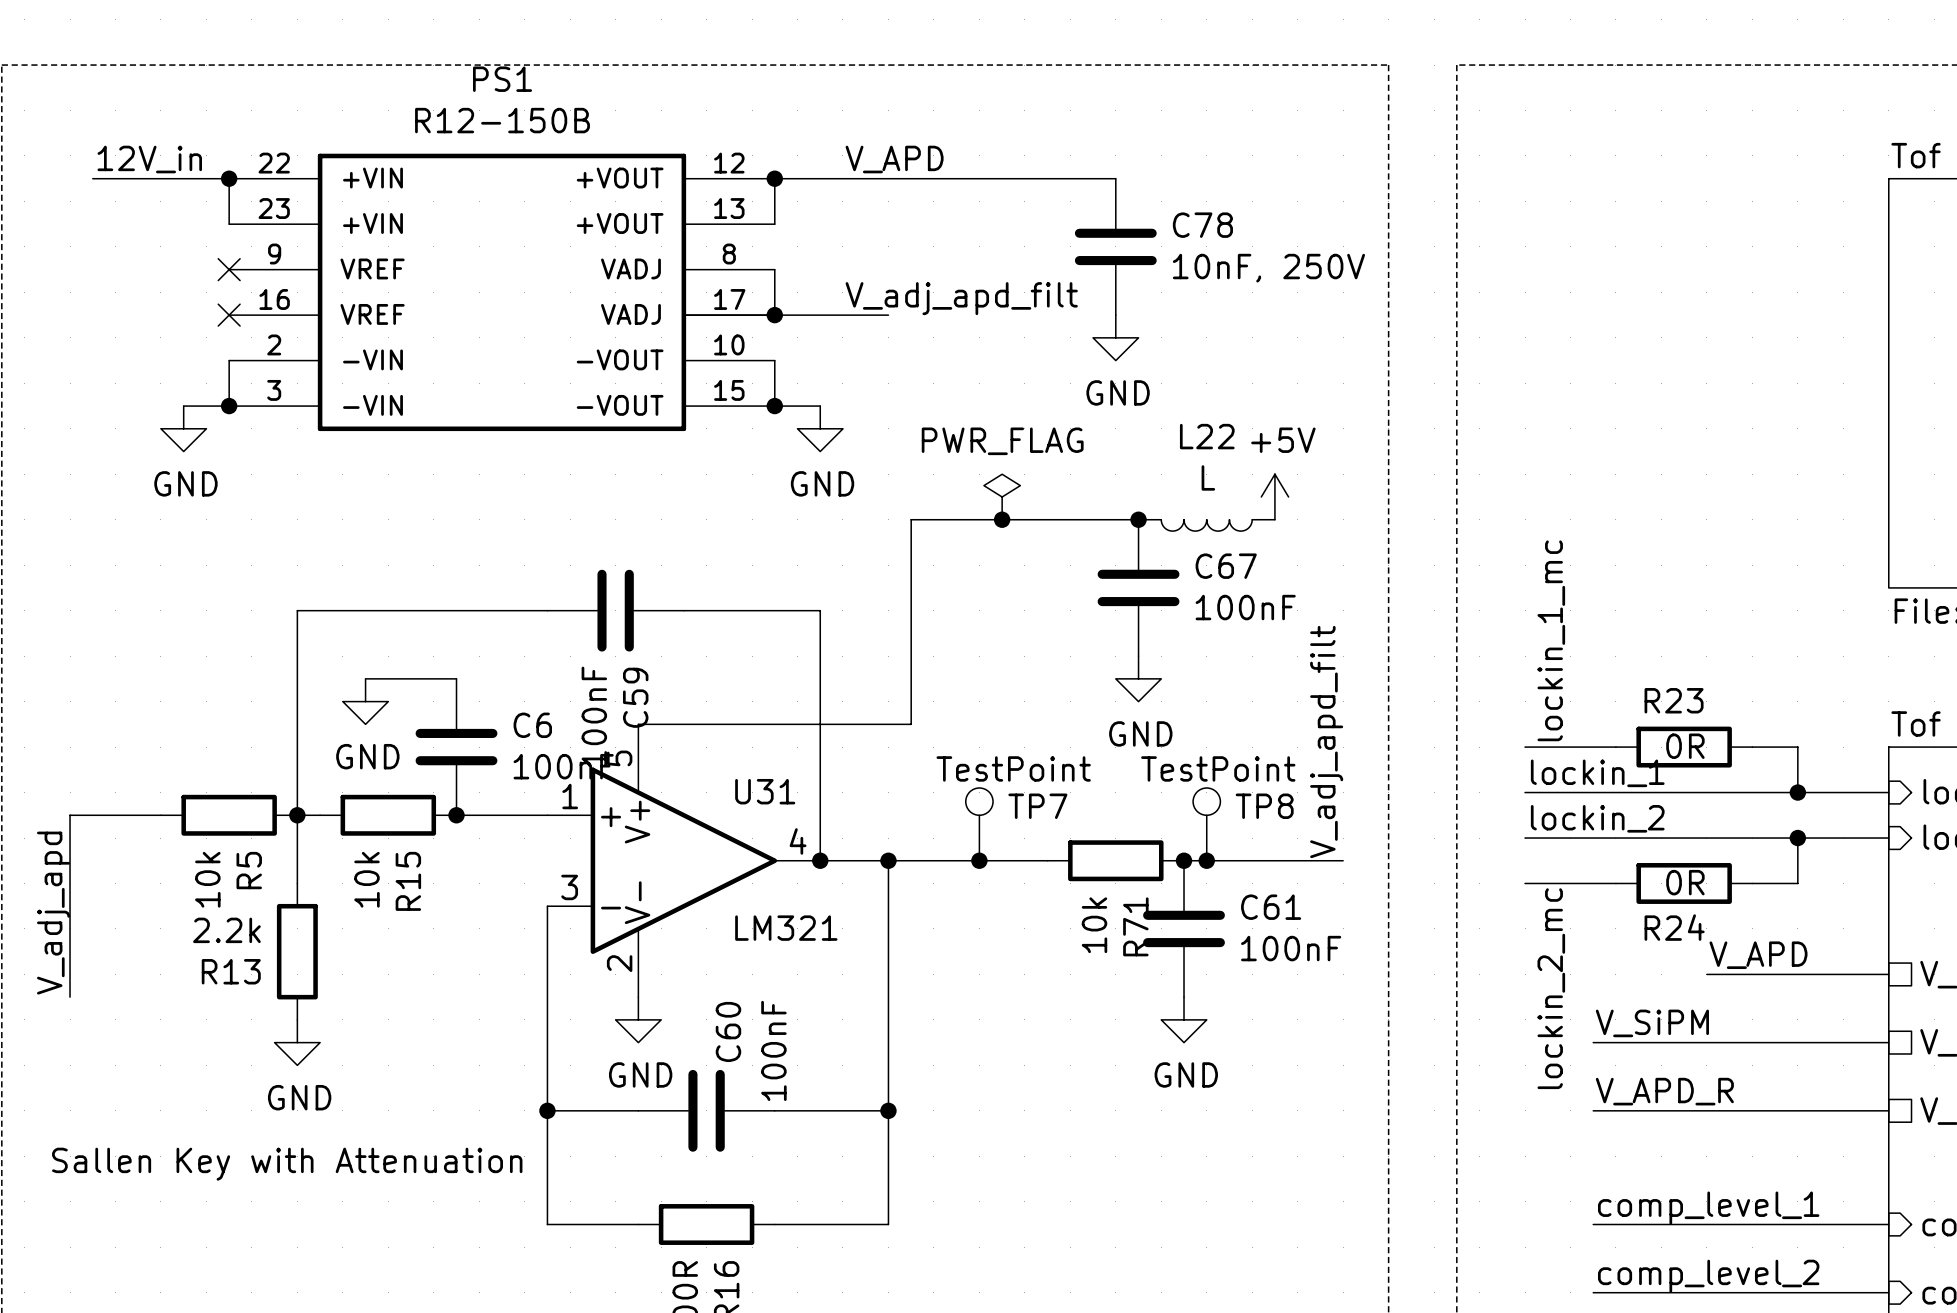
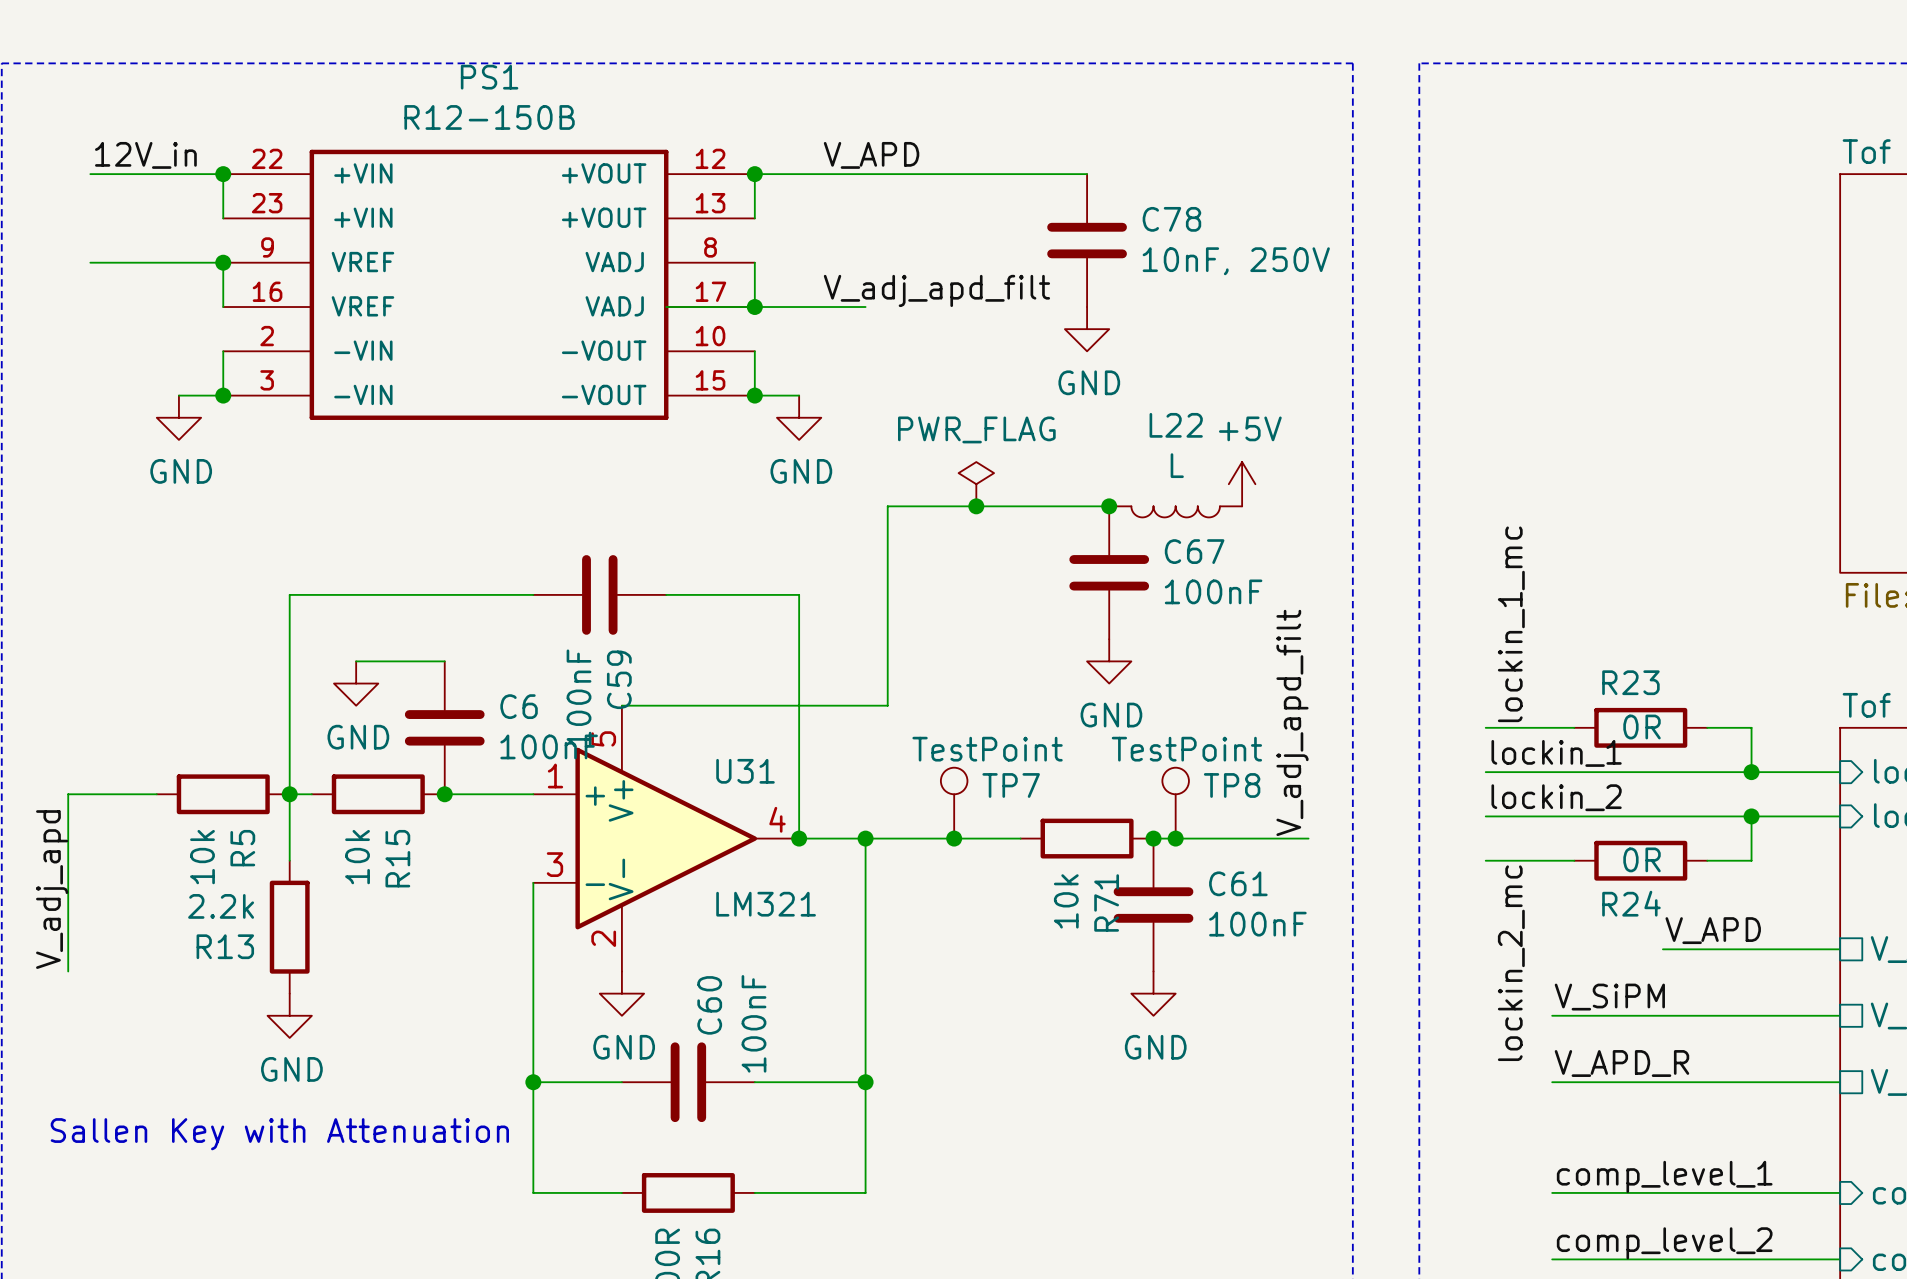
wire: none -> (90, 262) (223, 262) (223, 307)
no-connect mark: (229, 269) -> none
junction: none -> (223, 262)
no-connect mark: (229, 315) -> none

